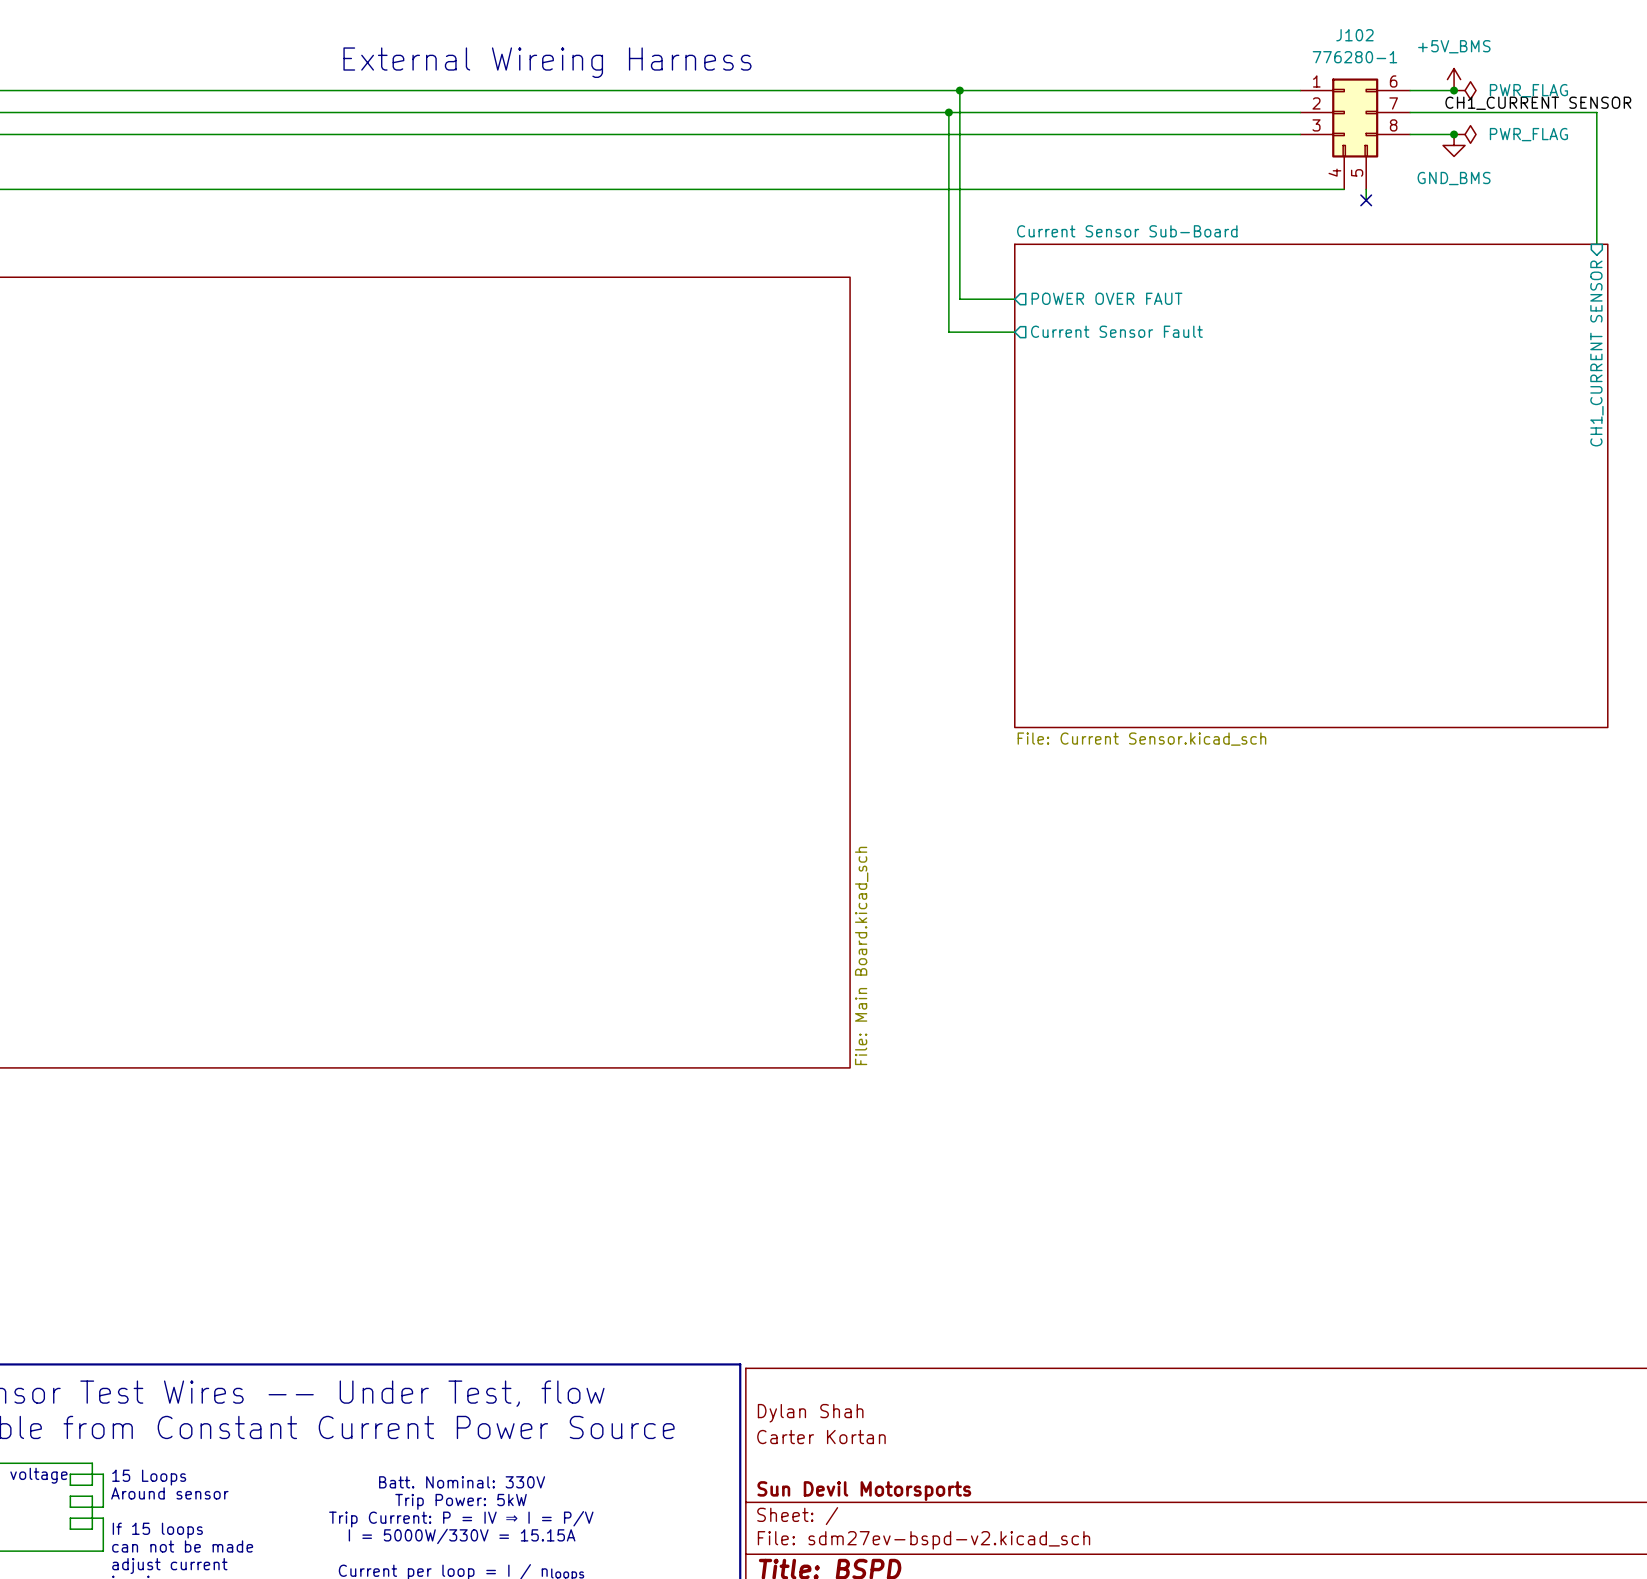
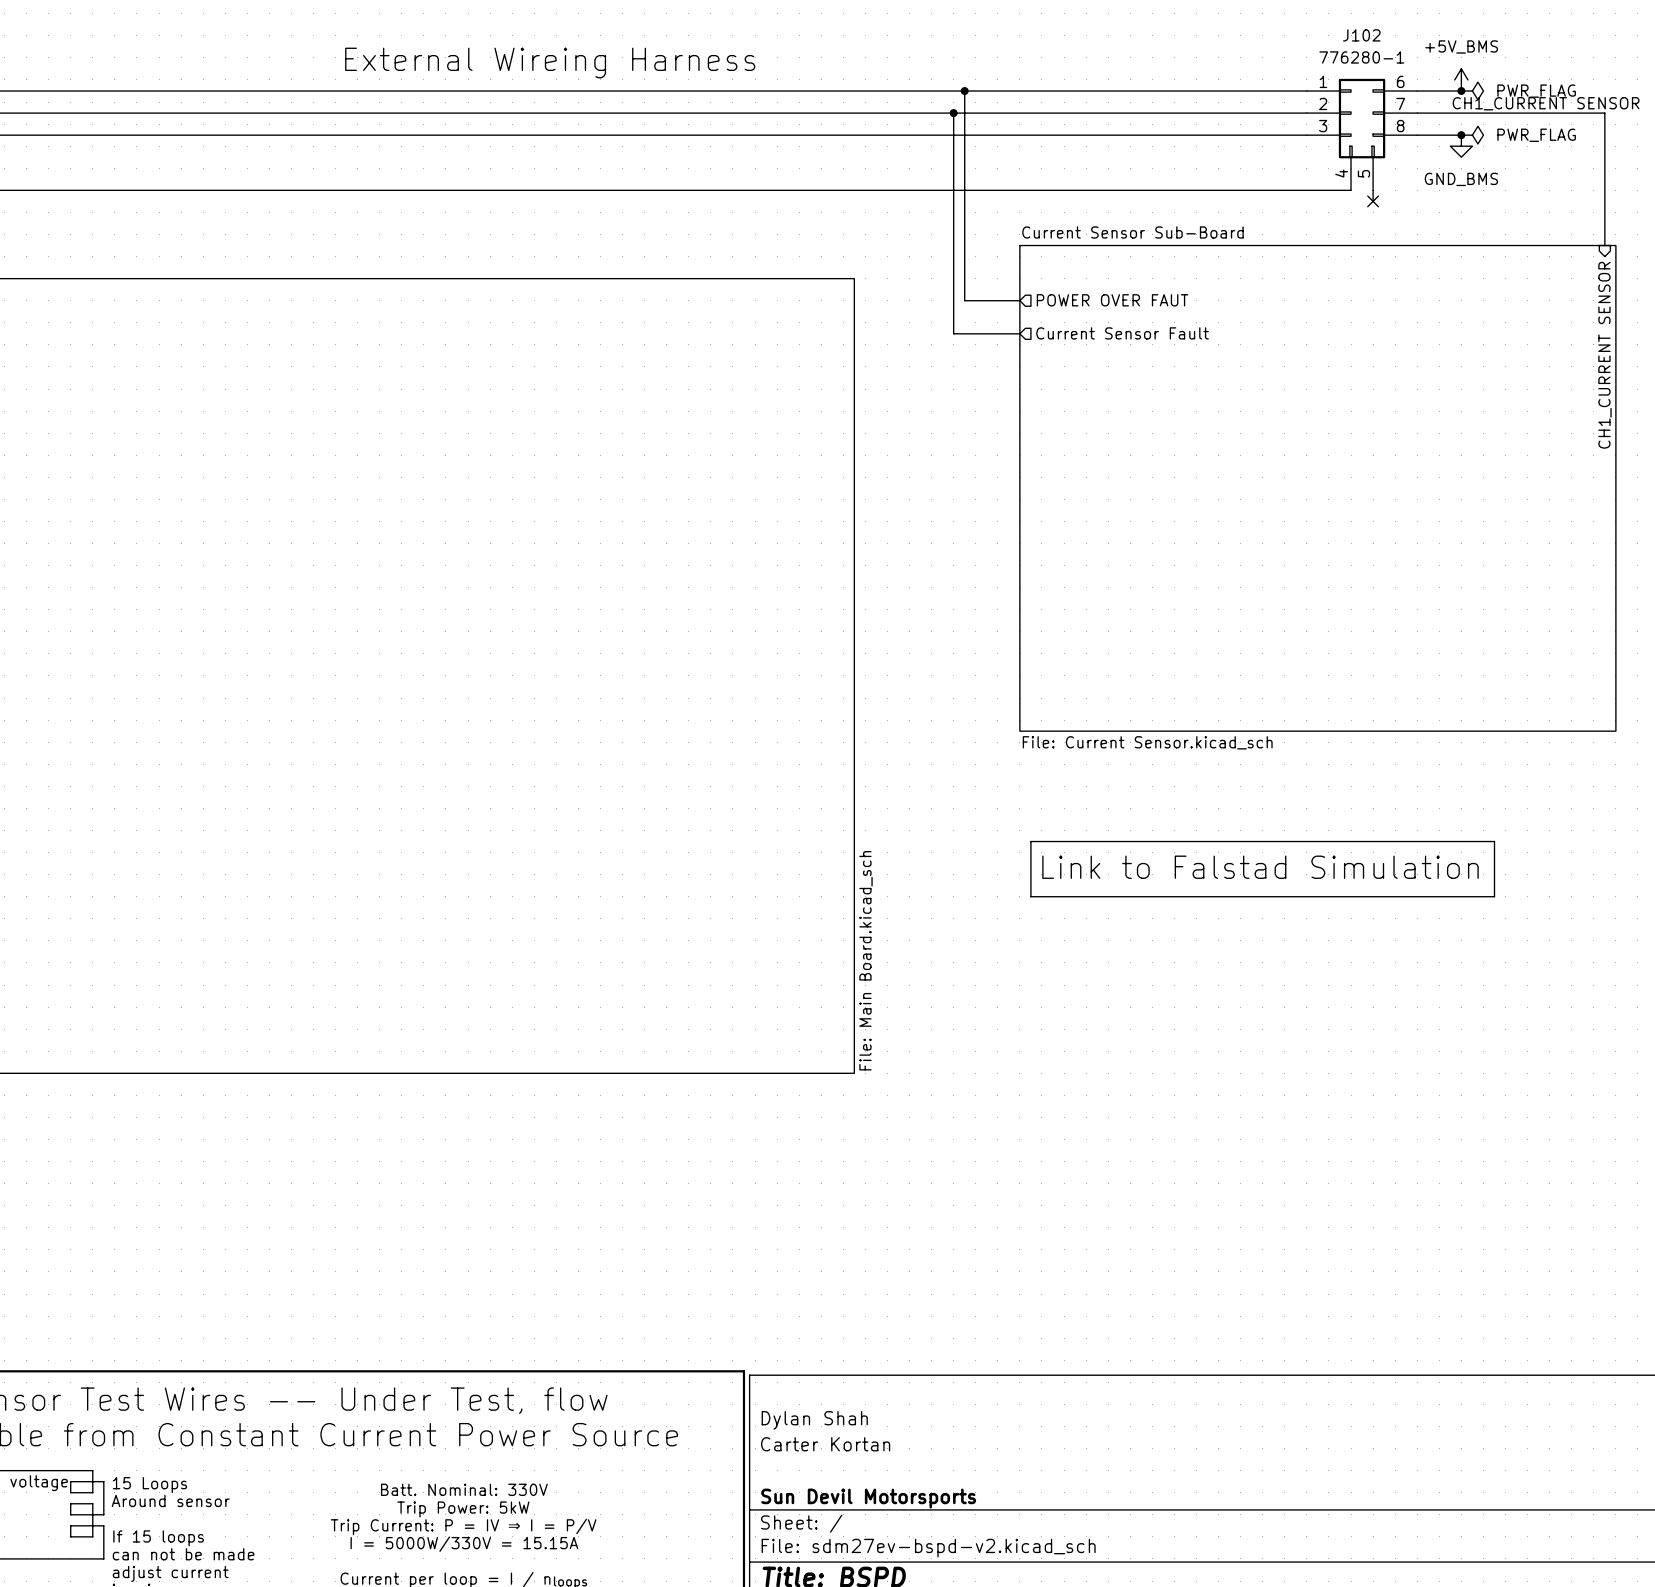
line: none -> (1030, 841) (1494, 841) (1494, 896) (1030, 896) (1030, 841)
text: none -> Link to Falstad Simulation (1260, 867)

